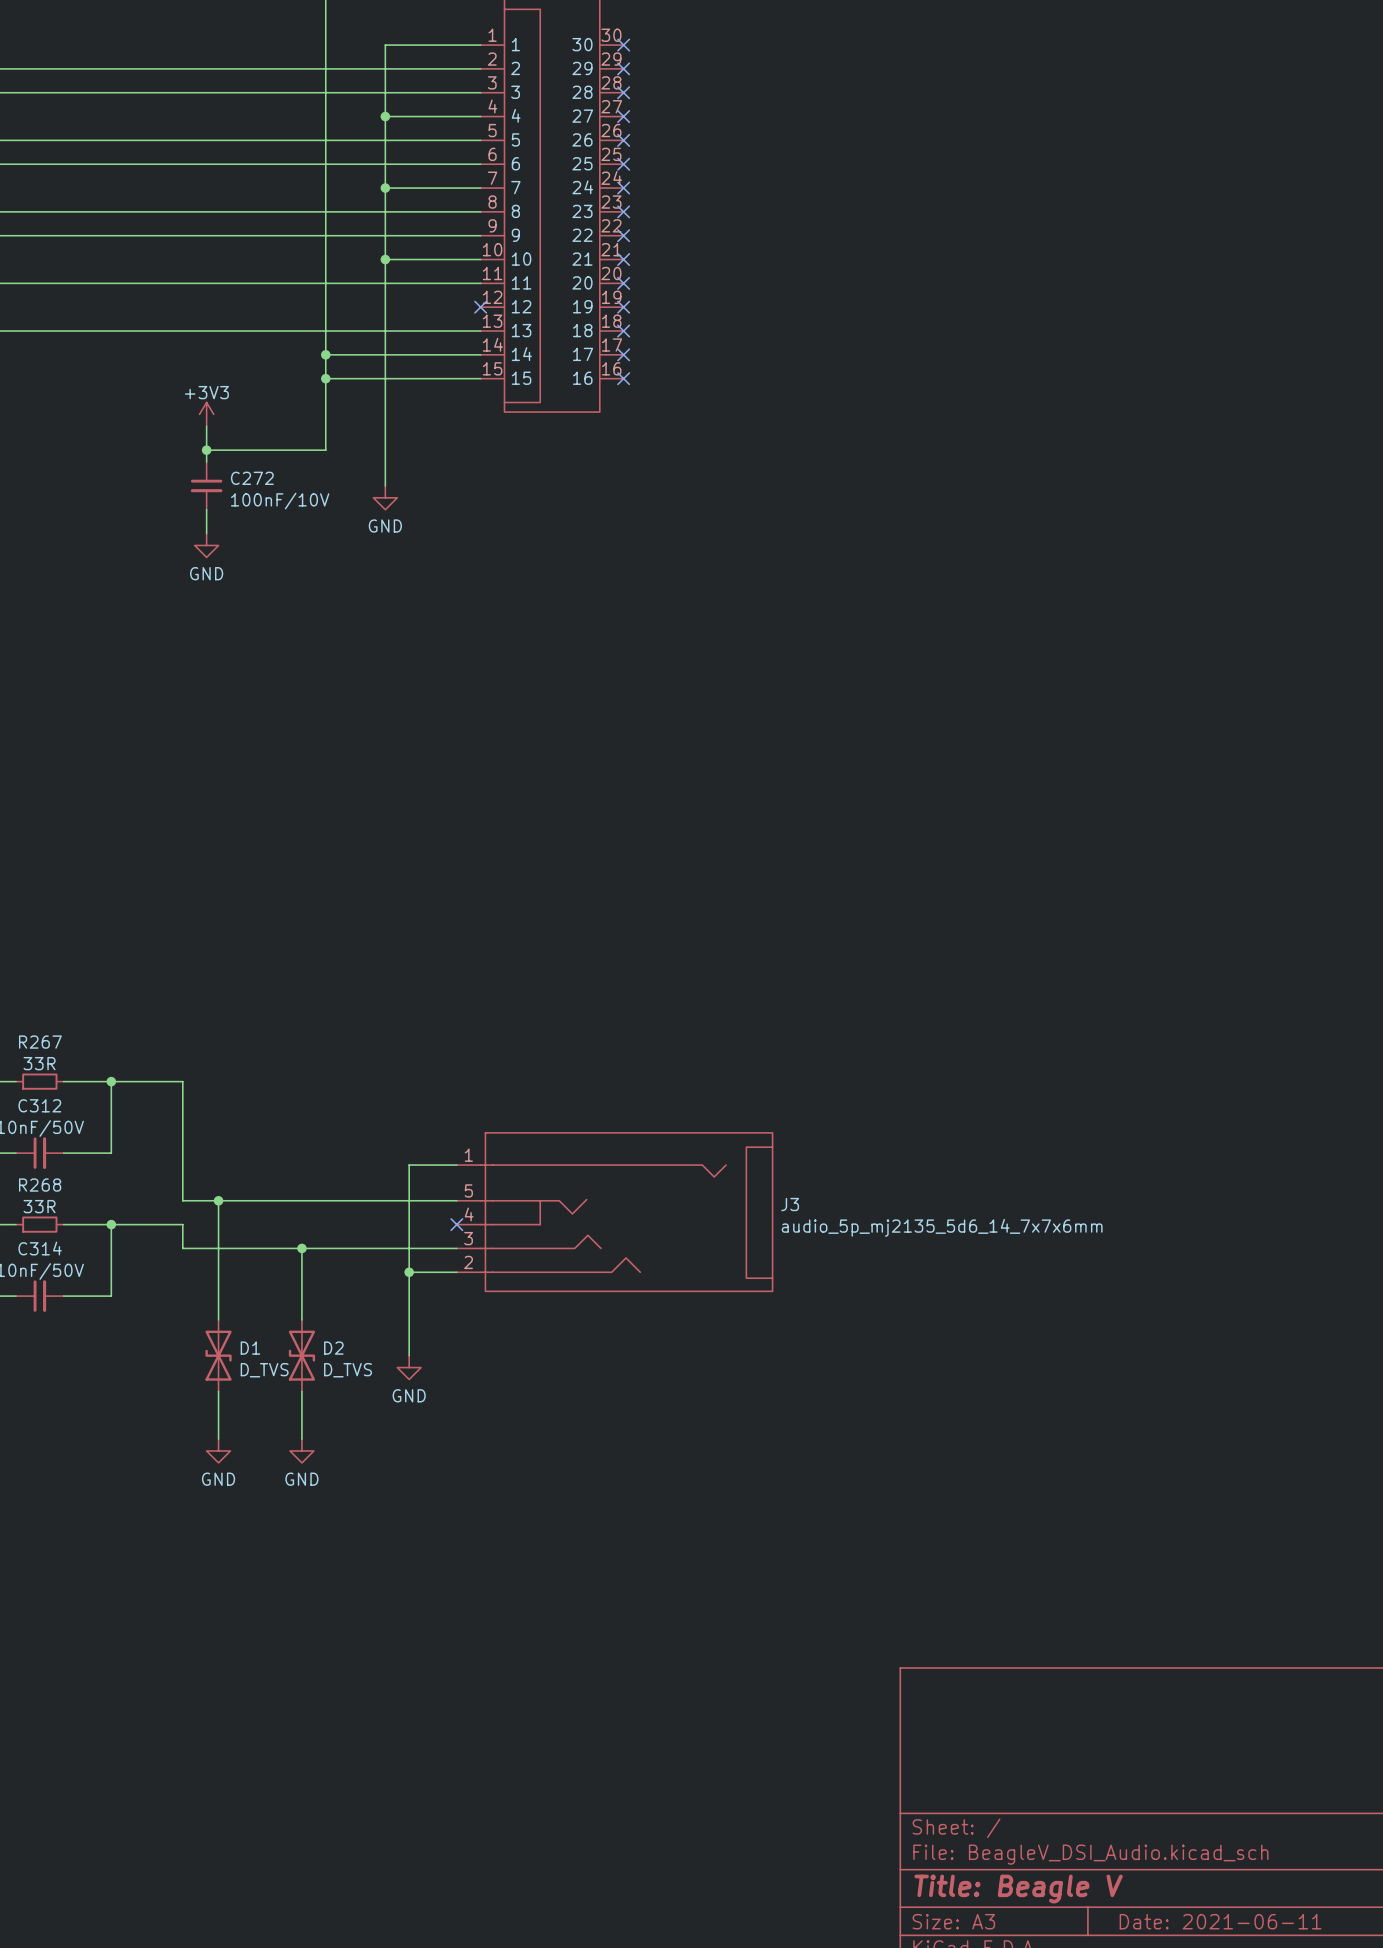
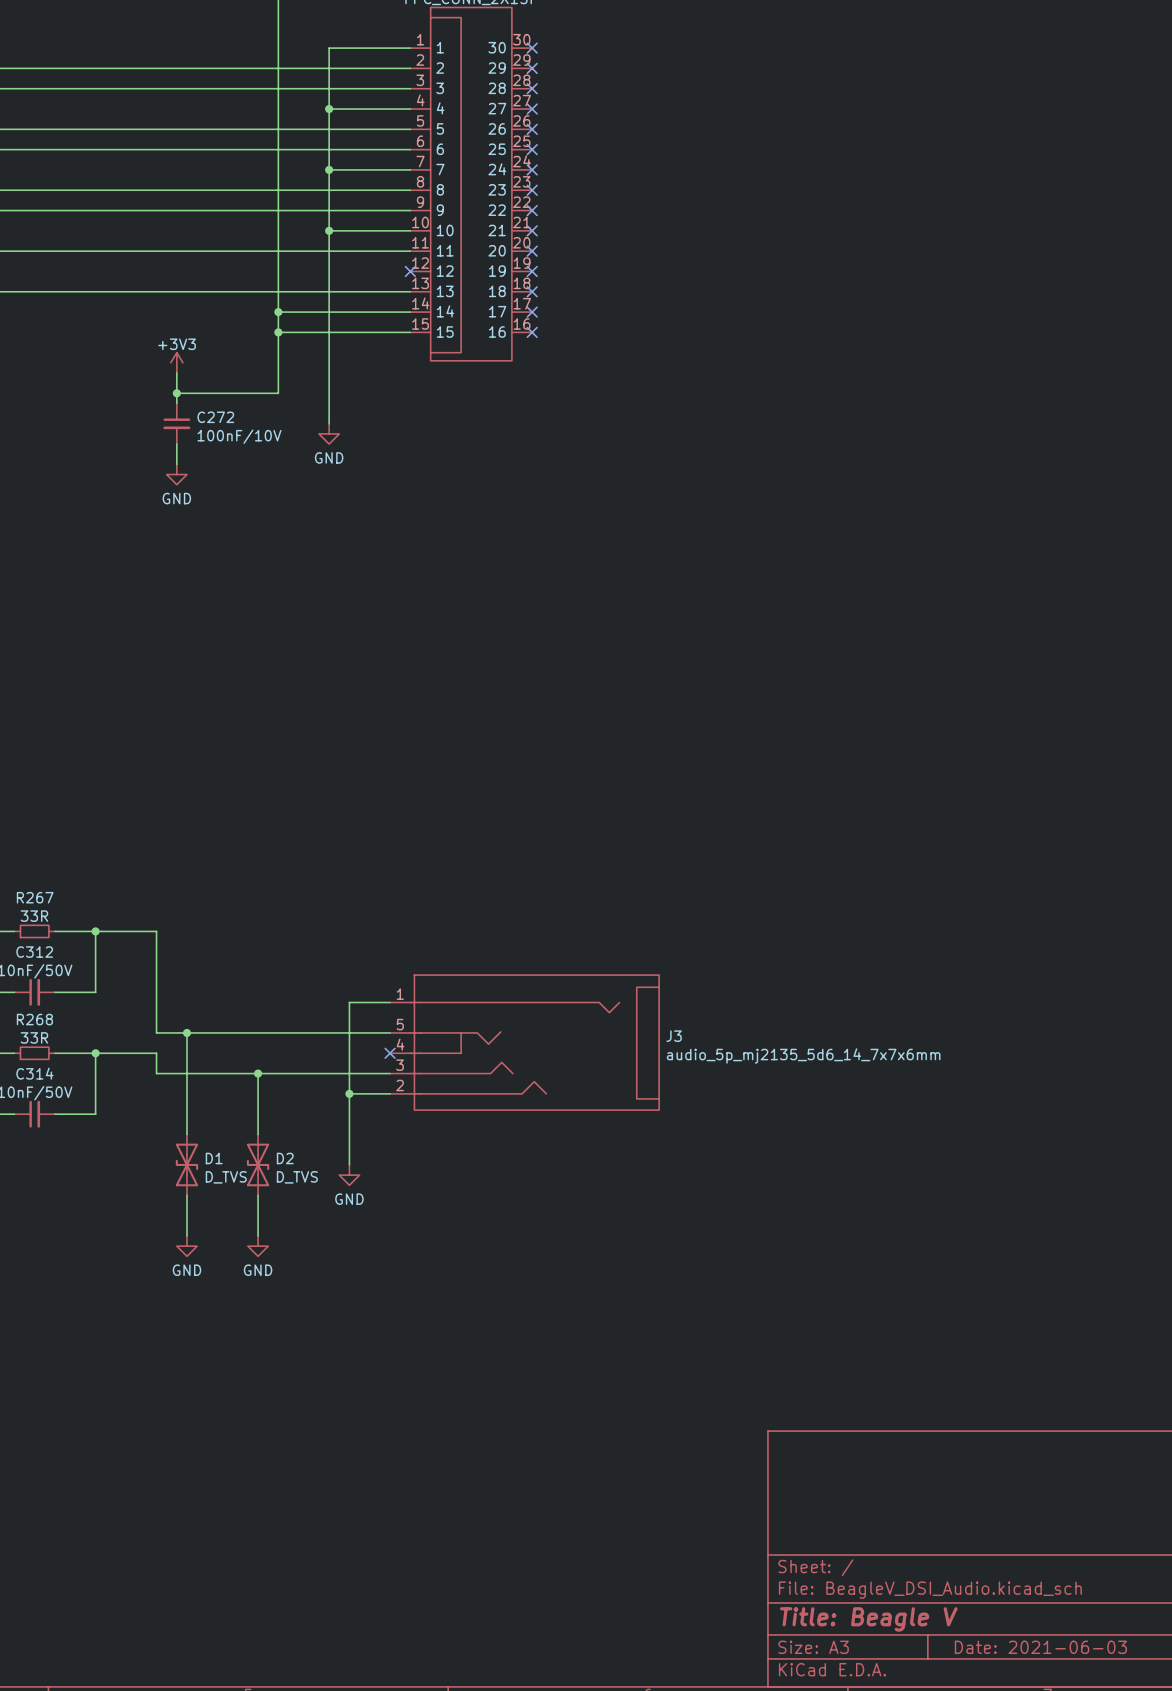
title block: Date: 2021-06-11 (1220, 1921) -> Date: 2021-06-03 (1040, 1647)

